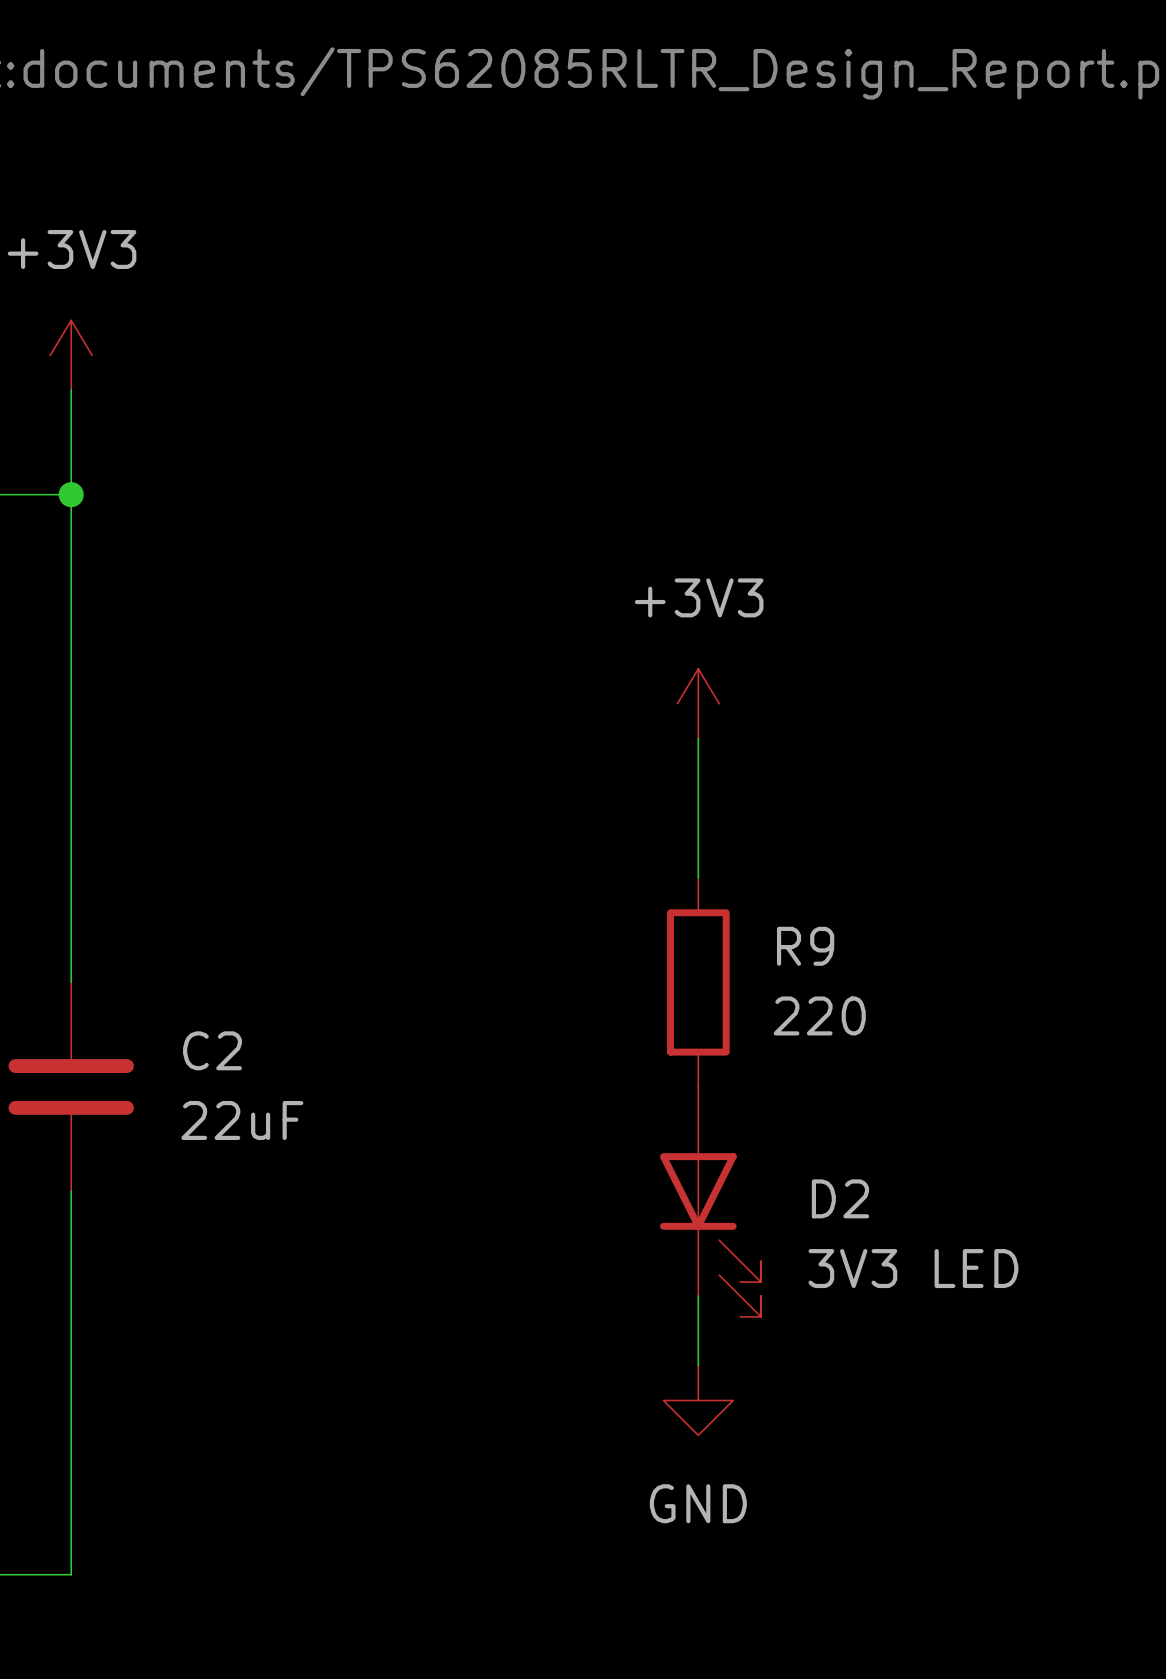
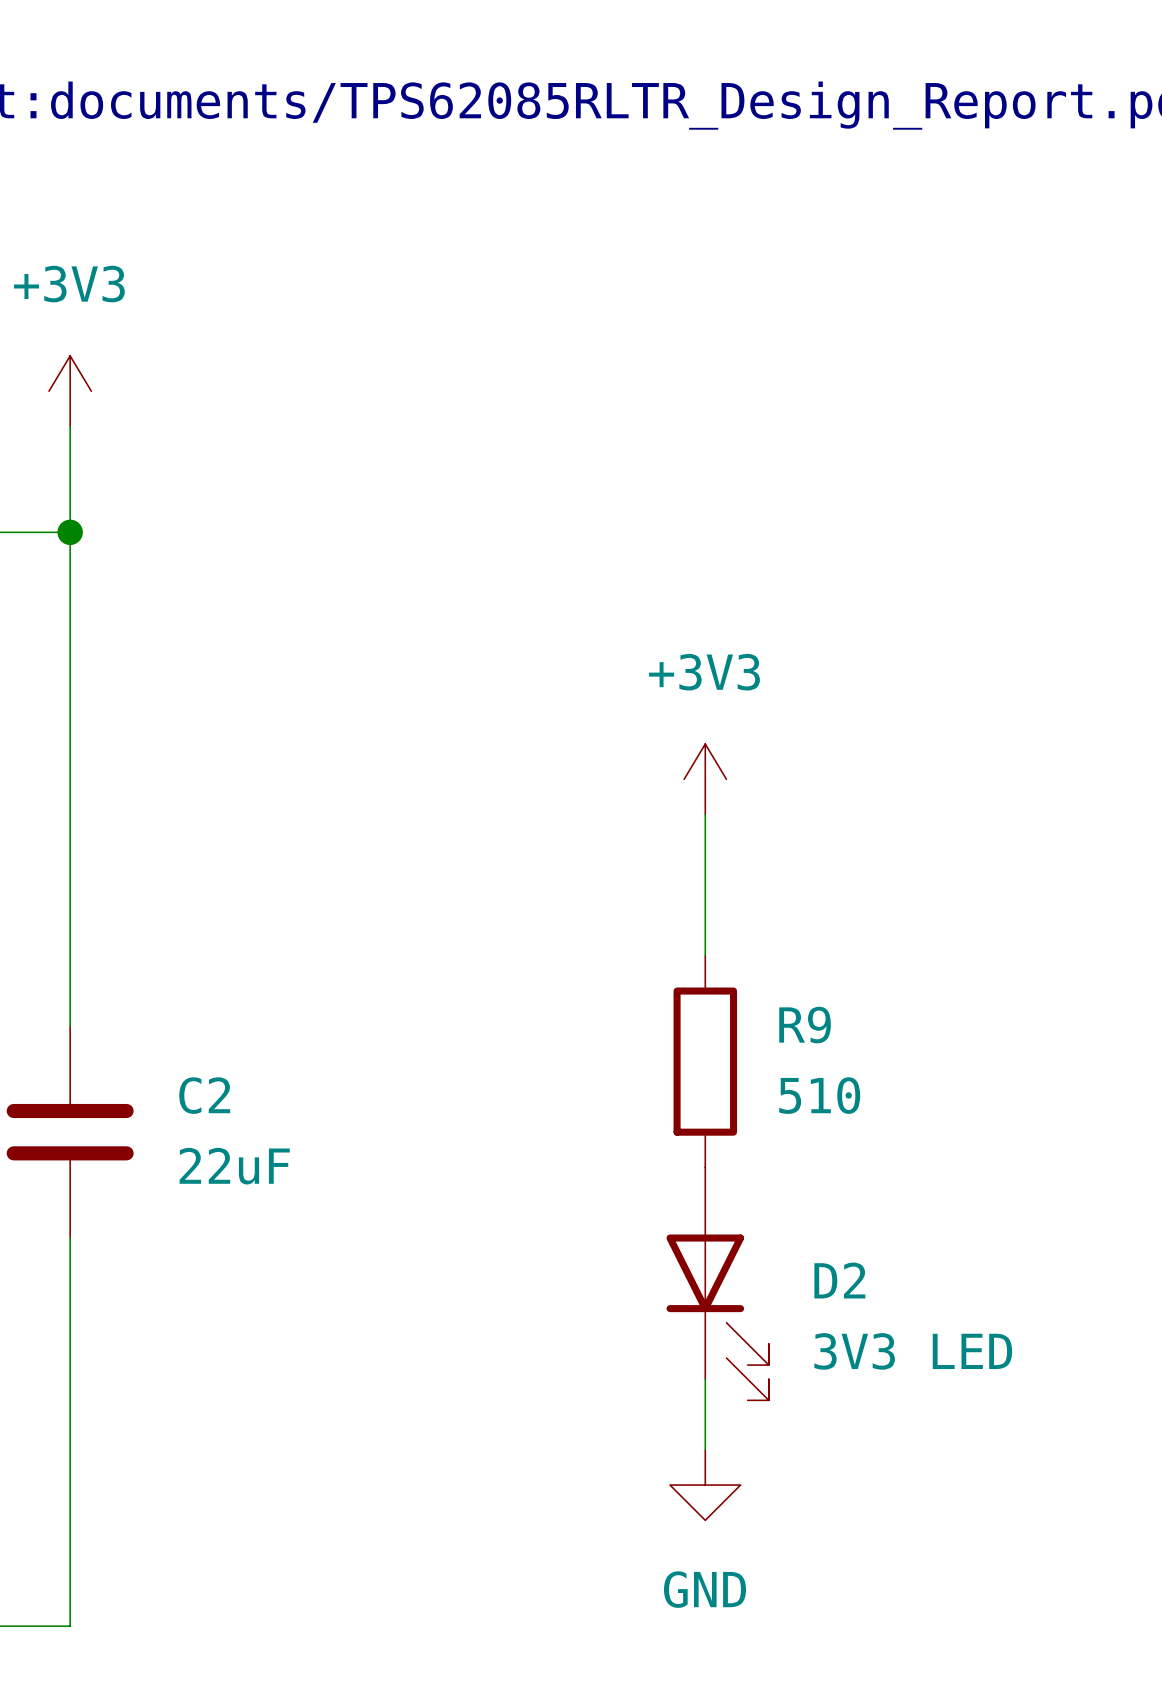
power symbol position: +3V3 (698, 703) -> +3V3 (705, 779)
R9 position: (698, 982) -> (705, 1061)
R9 value: 220 (819, 1015) -> 510 (819, 1095)
D2 position: (710, 1201) -> (717, 1283)
power symbol position: GND (698, 1400) -> GND (705, 1485)

